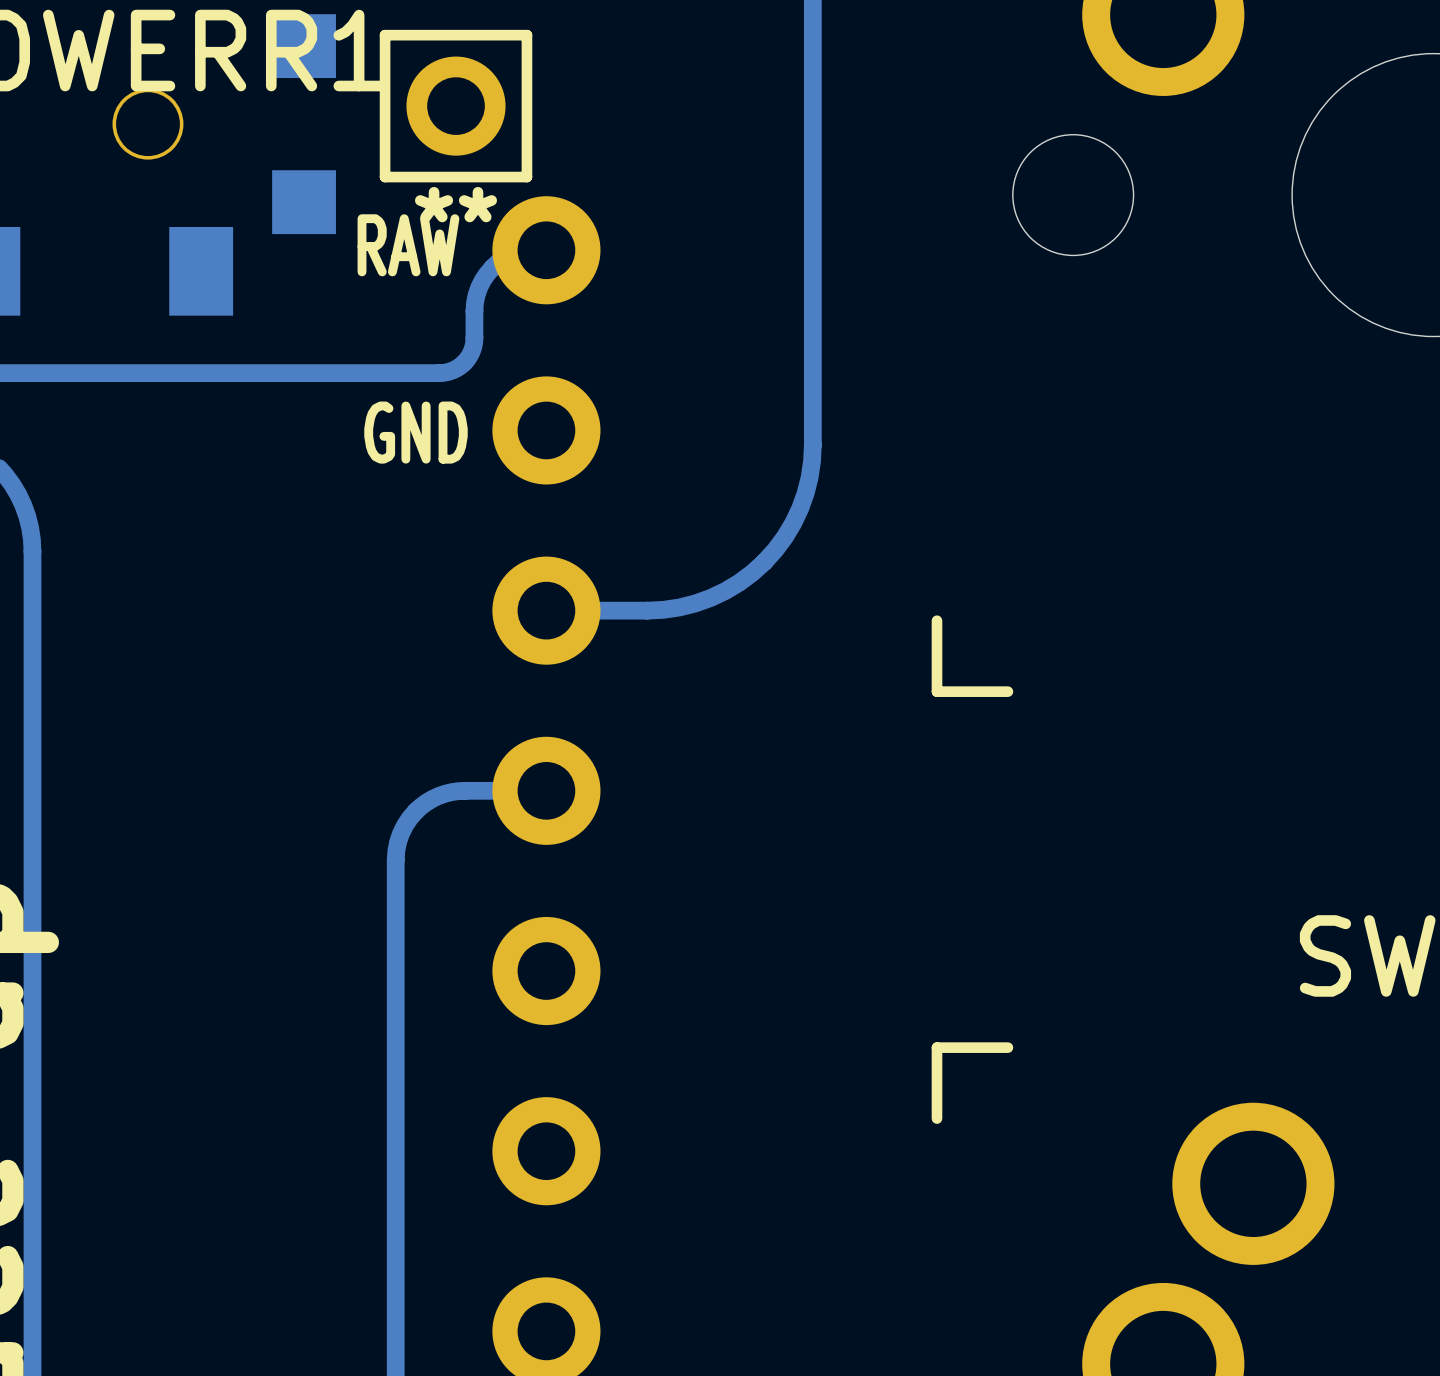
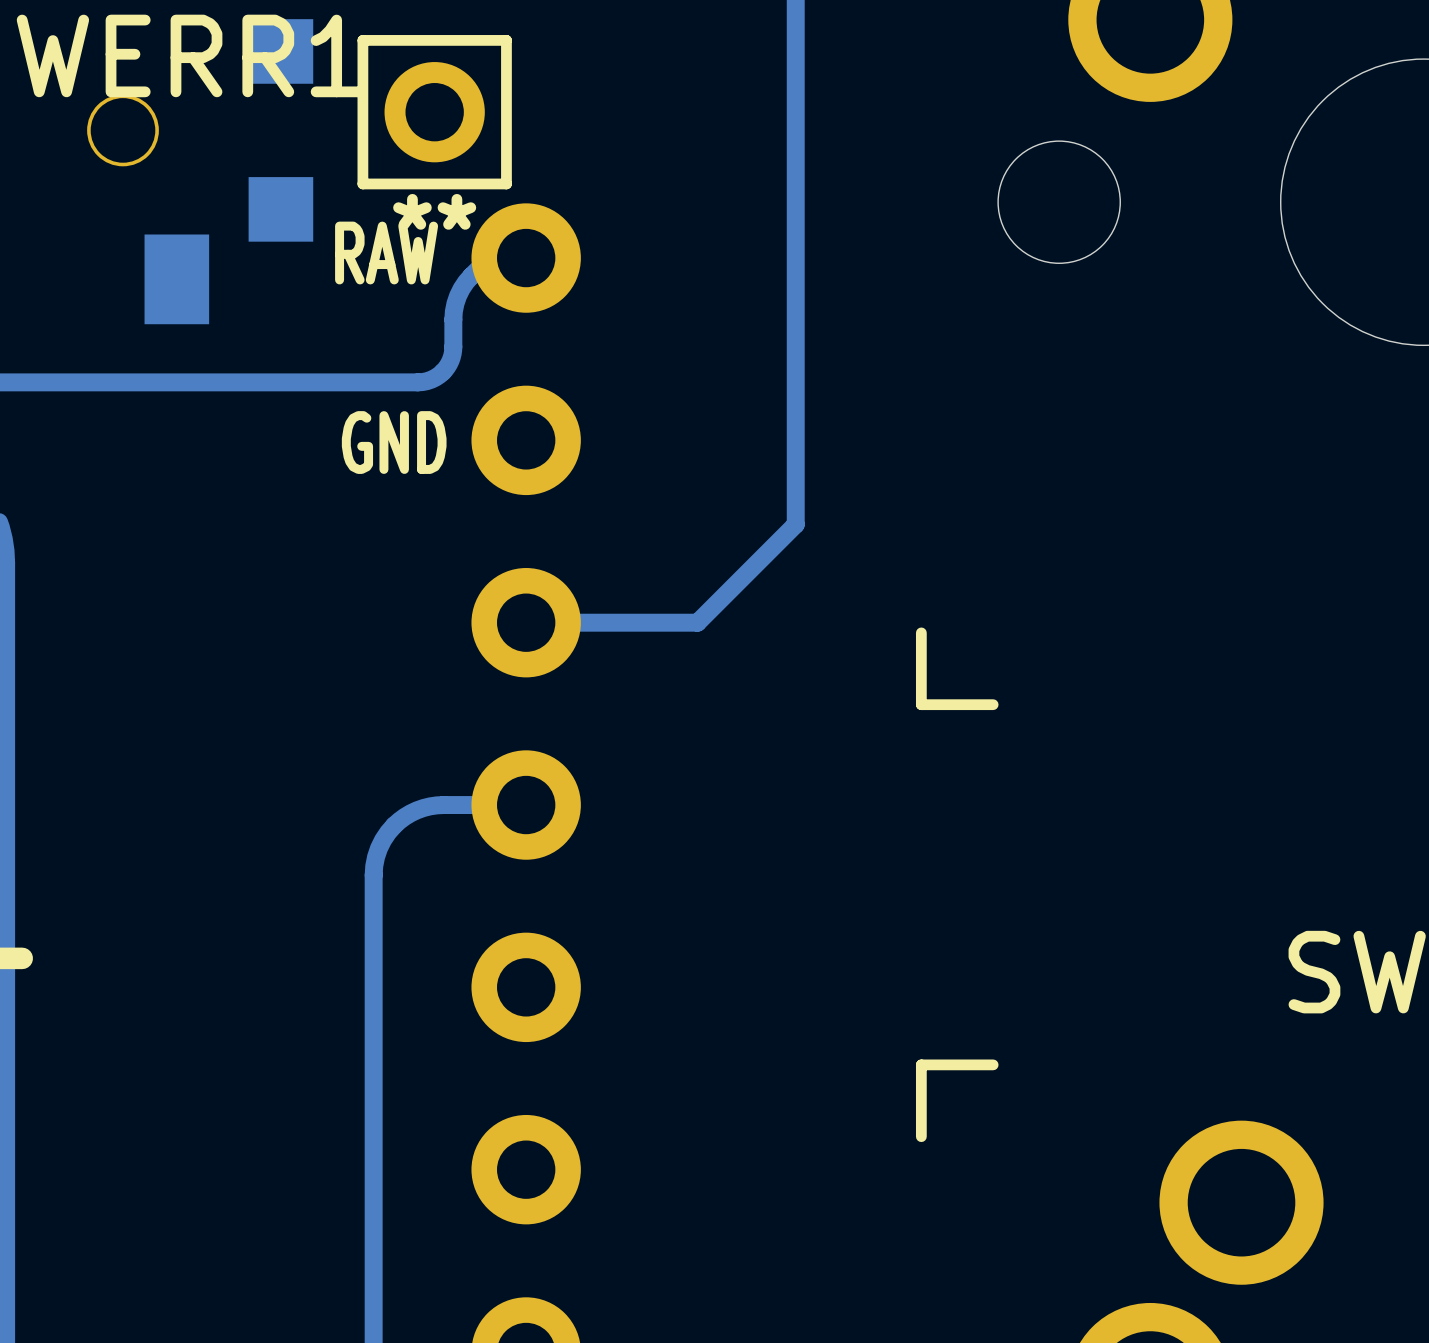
track: (812, 444) (809, 477) (800, 508) (784, 537) (764, 562) (739, 582) (710, 598) (679, 607) (647, 610) -> (795, 455) (795, 524) (697, 622) (628, 622)

